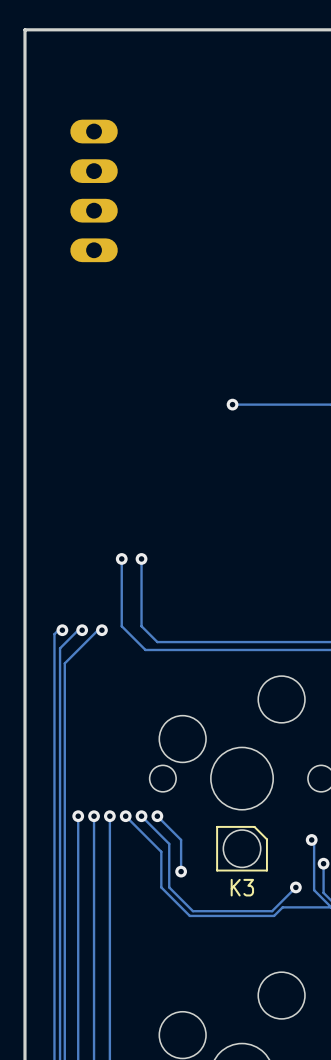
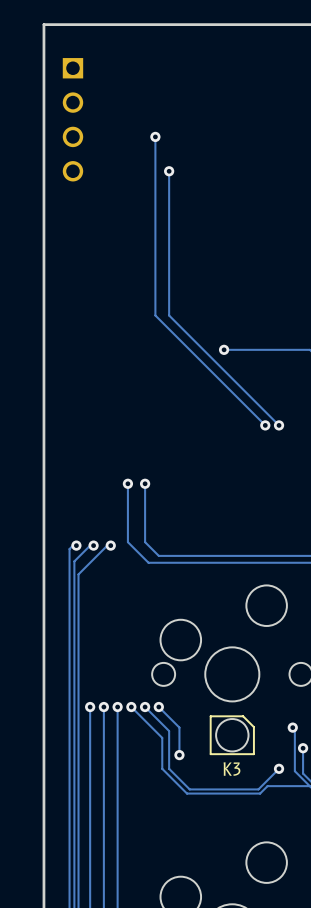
part: none -> (72, 119)
track: none -> (155, 136) (155, 315) (265, 425)
via: none -> (155, 136)
part: (94, 190) -> none
track: none -> (169, 171) (169, 315) (279, 425)
via: none -> (169, 171)
via: none -> (265, 425)
via: none -> (279, 425)

